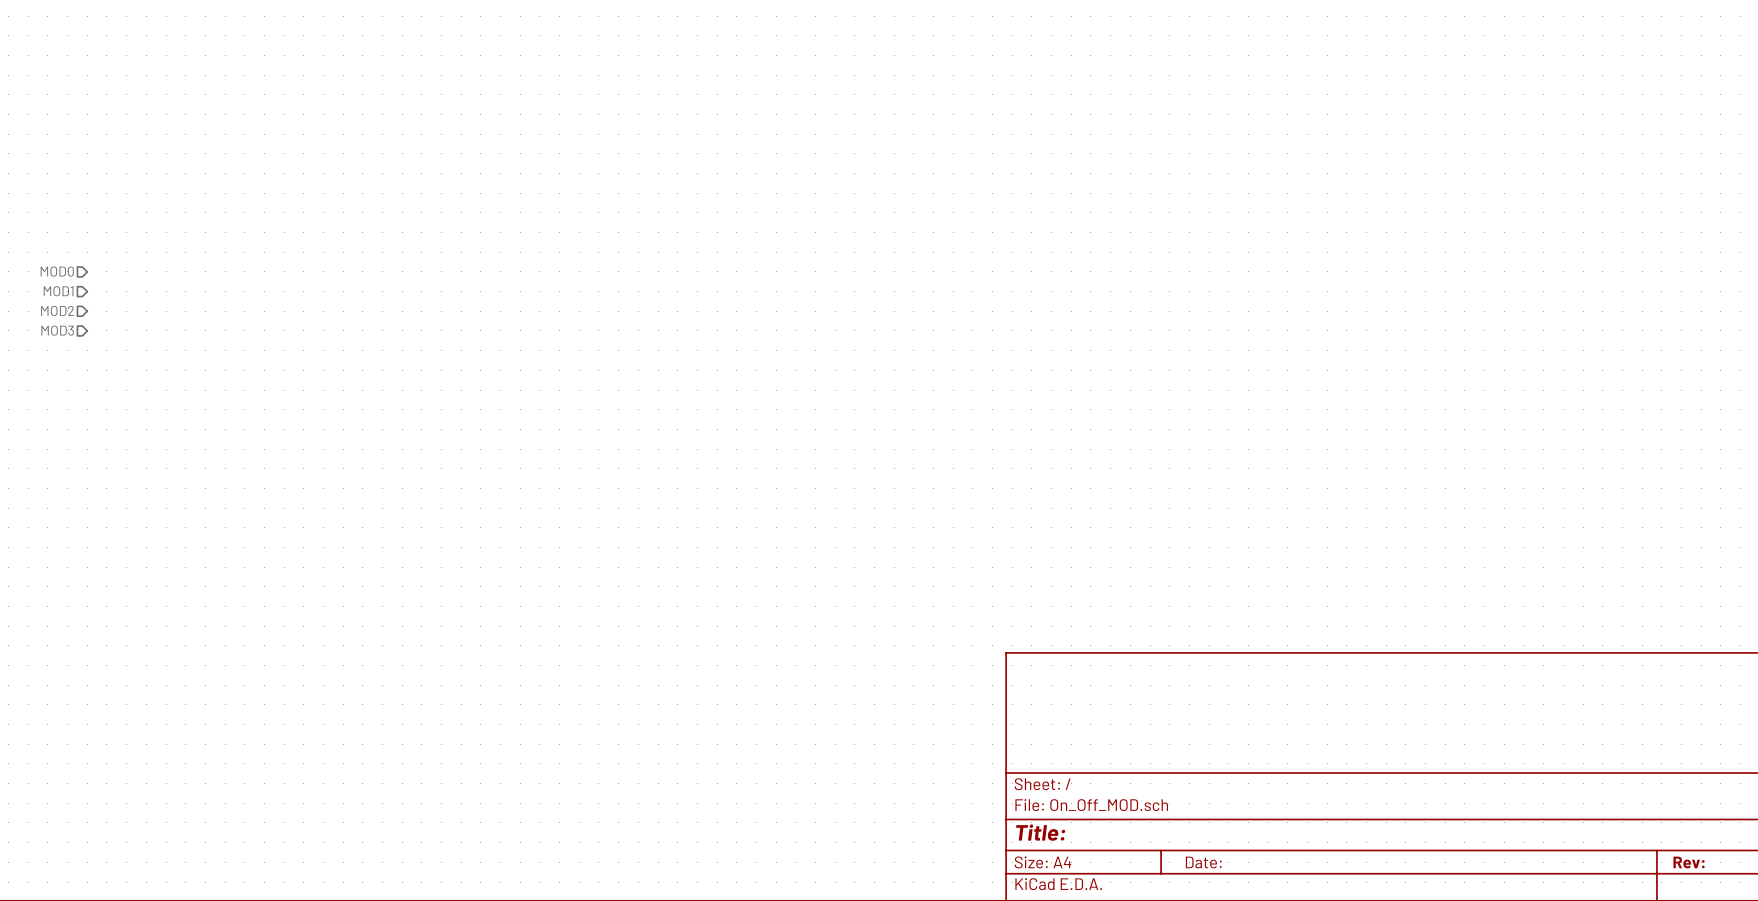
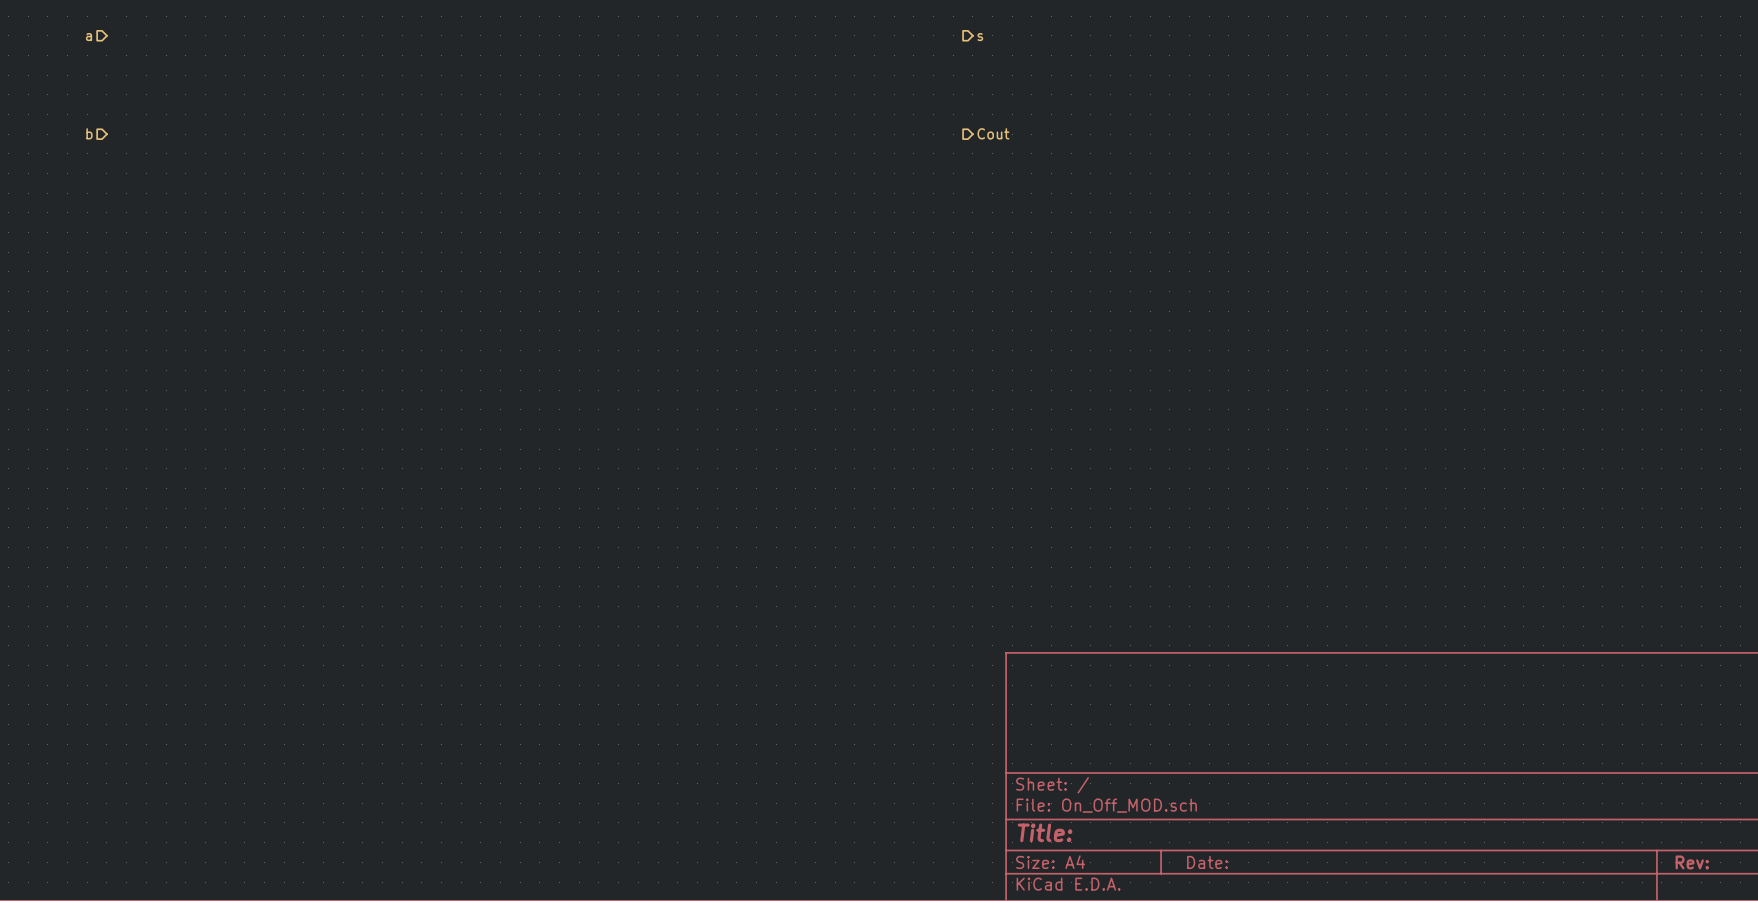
hierarchical label: none -> a (89, 37)
hierarchical label: none -> s (980, 37)
hierarchical label: none -> b (89, 133)
hierarchical label: none -> Cout (993, 133)
hierarchical label: MOD0 (57, 271) -> none
hierarchical label: MOD1 (58, 291) -> none
hierarchical label: MOD2 (57, 310) -> none
hierarchical label: MOD3 (57, 330) -> none

